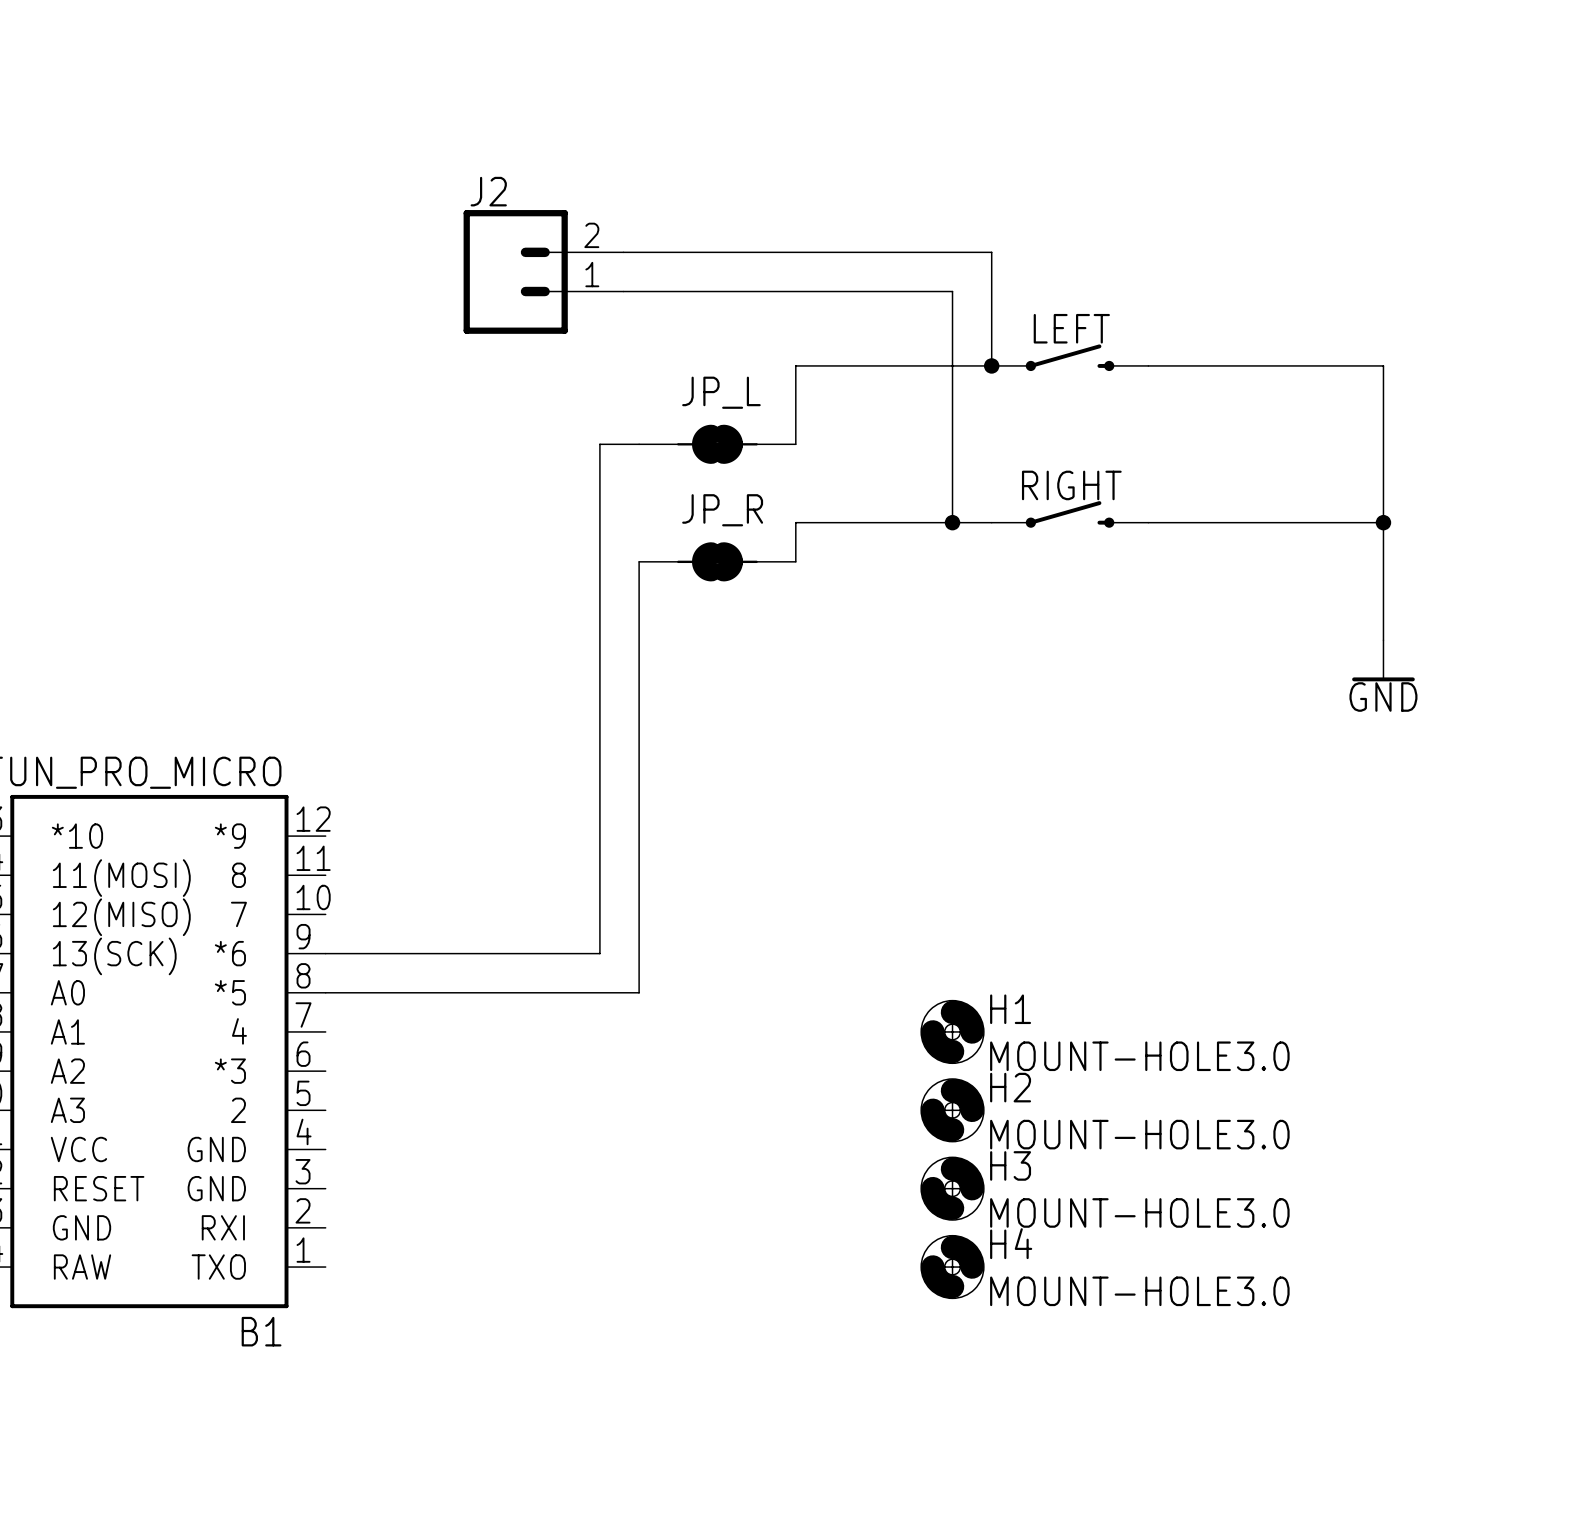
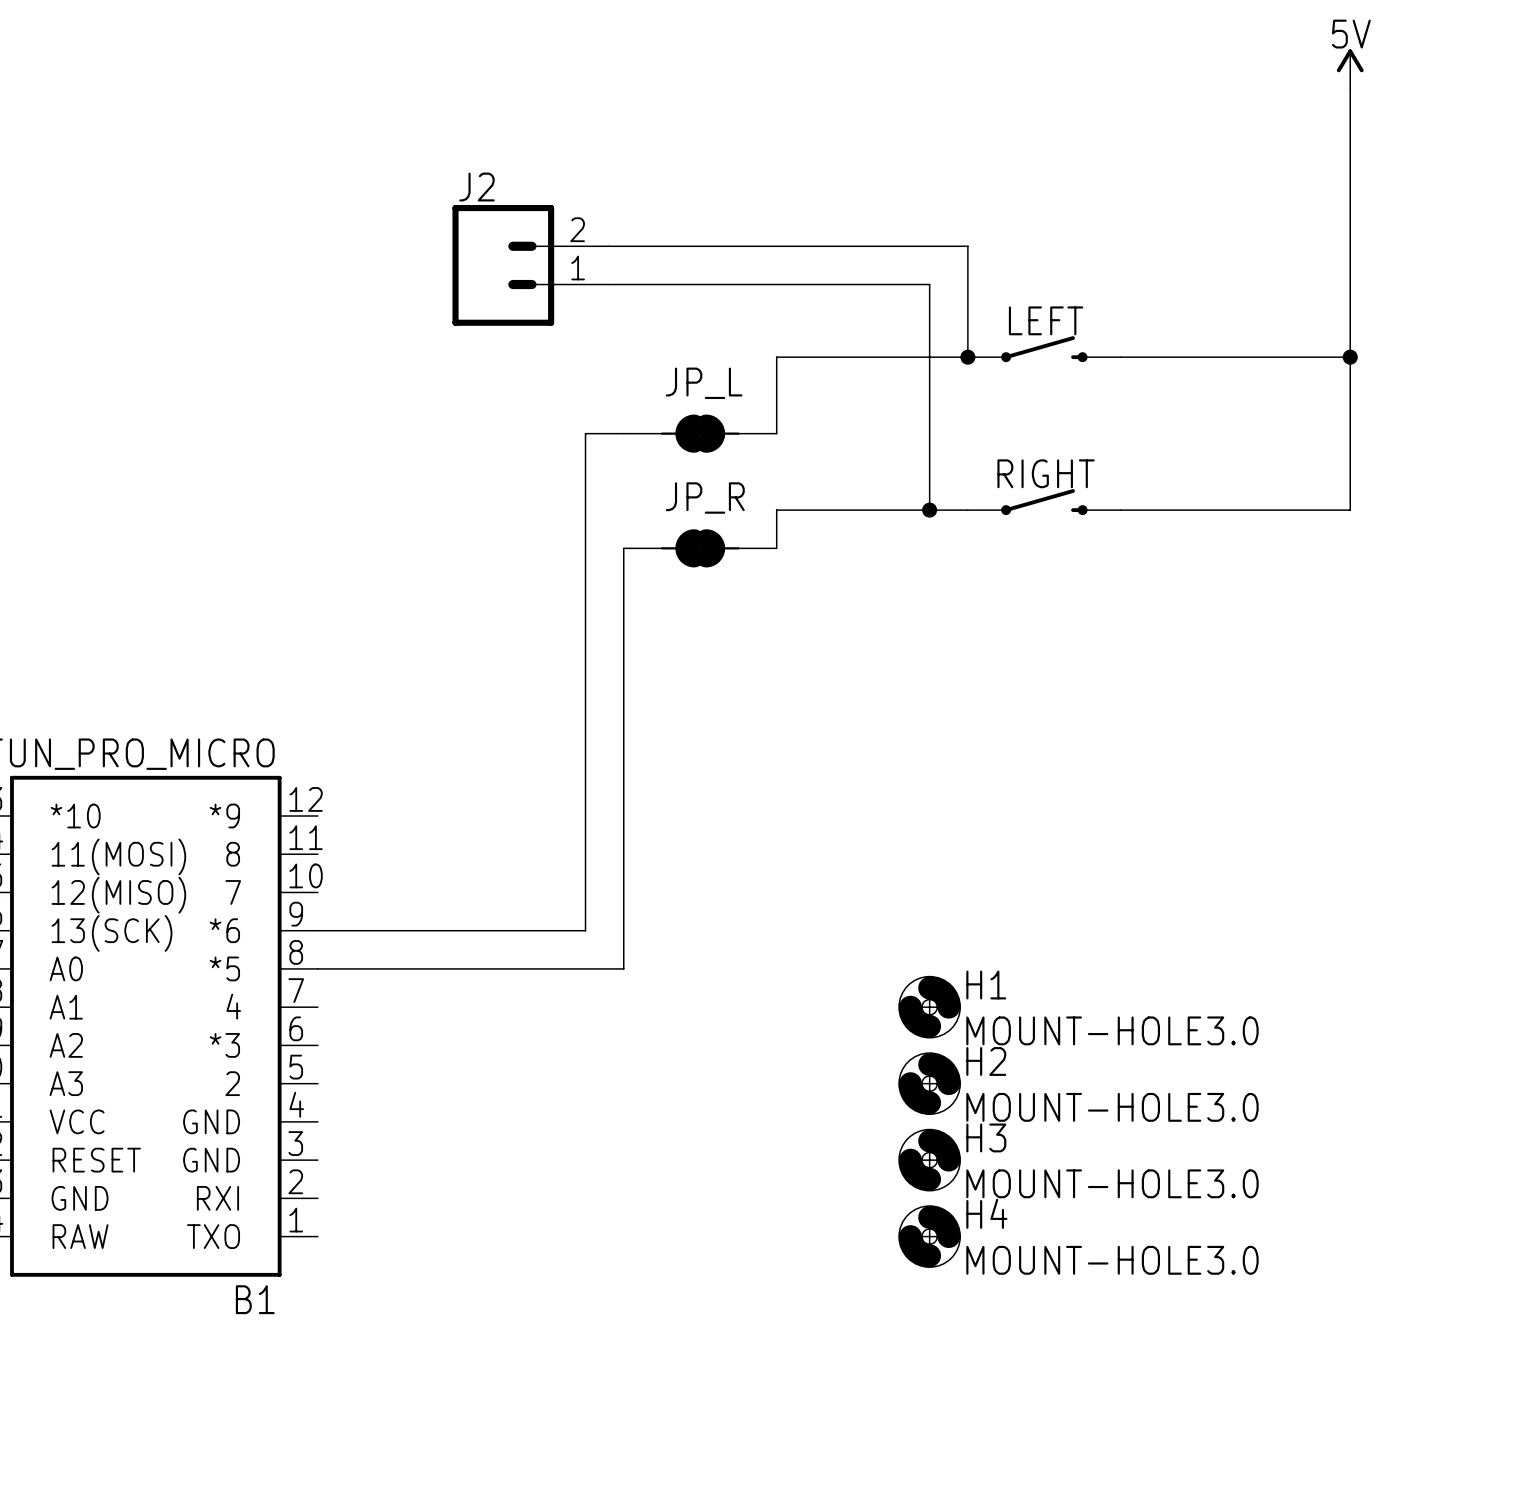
power symbol: none -> 5V (1350, 69)
wire: none -> (1350, 89) (1350, 357)
junction: none -> (1350, 357)
wire: (1383, 522) (1383, 640) -> none
junction: (1383, 522) -> none
power symbol: GND (1383, 660) -> none

